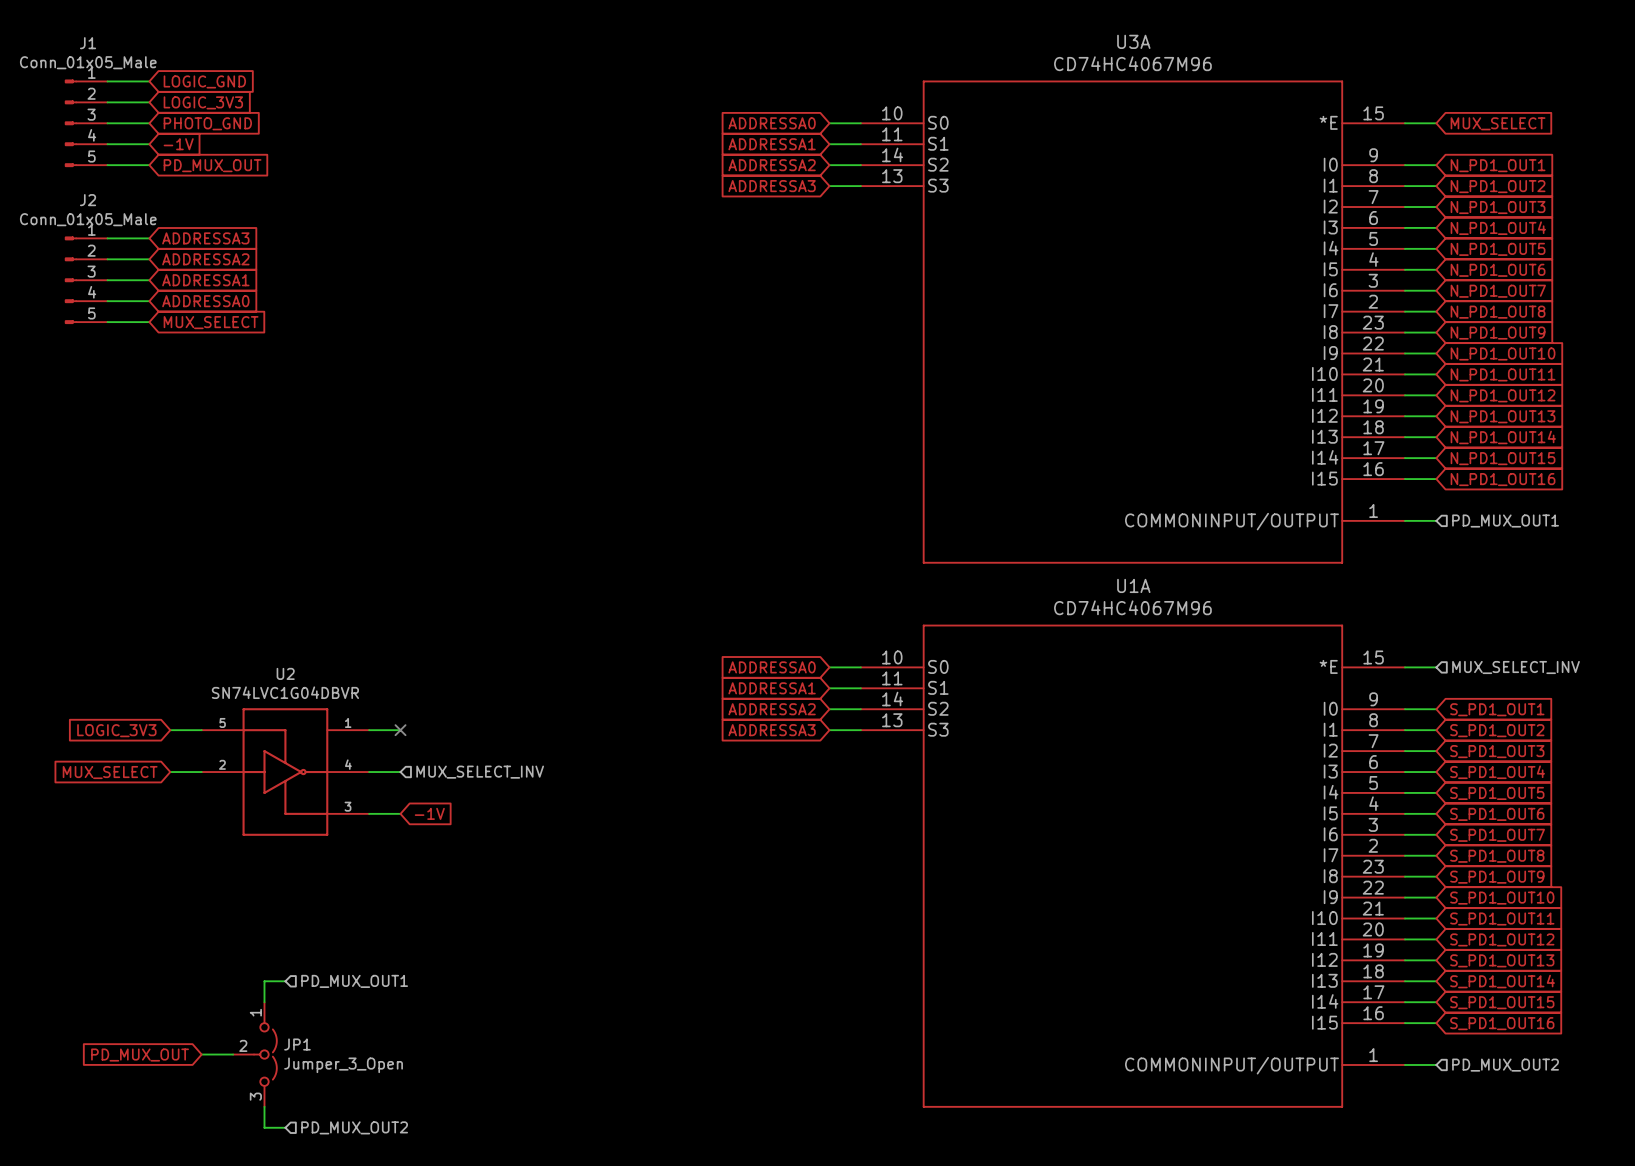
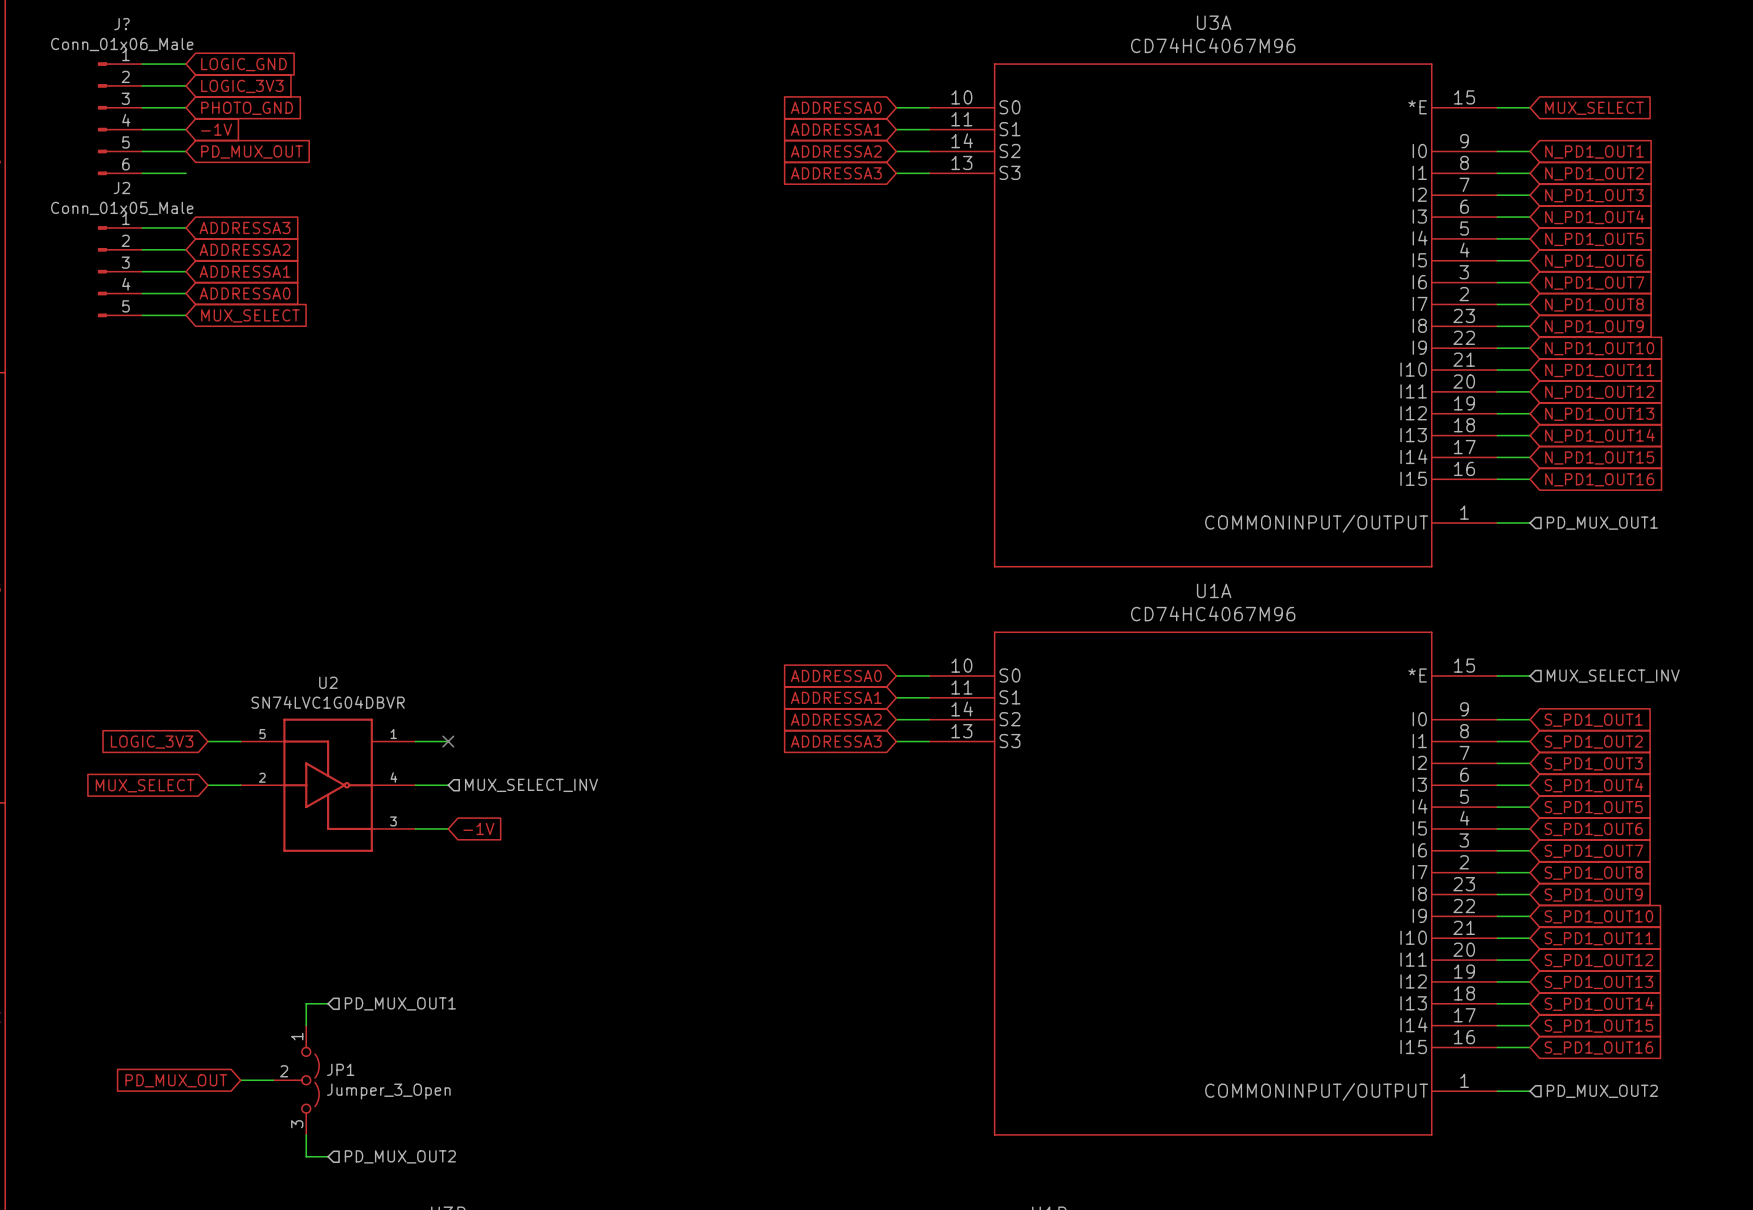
J1: Conn_01x05_Male (86, 123) -> none
J?: none -> Conn_01x06_Male (120, 118)
wire: none -> (142, 173) (186, 173)

